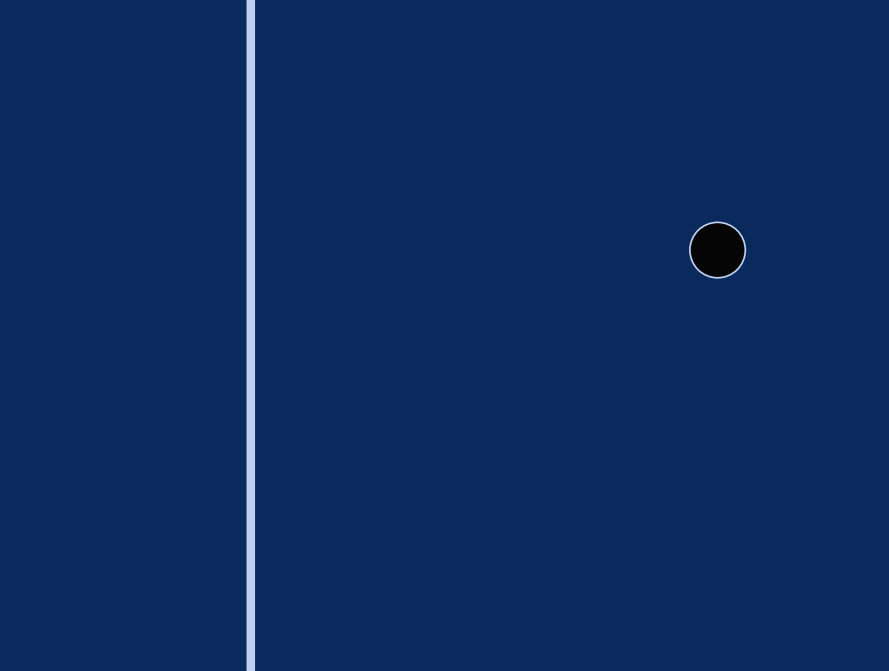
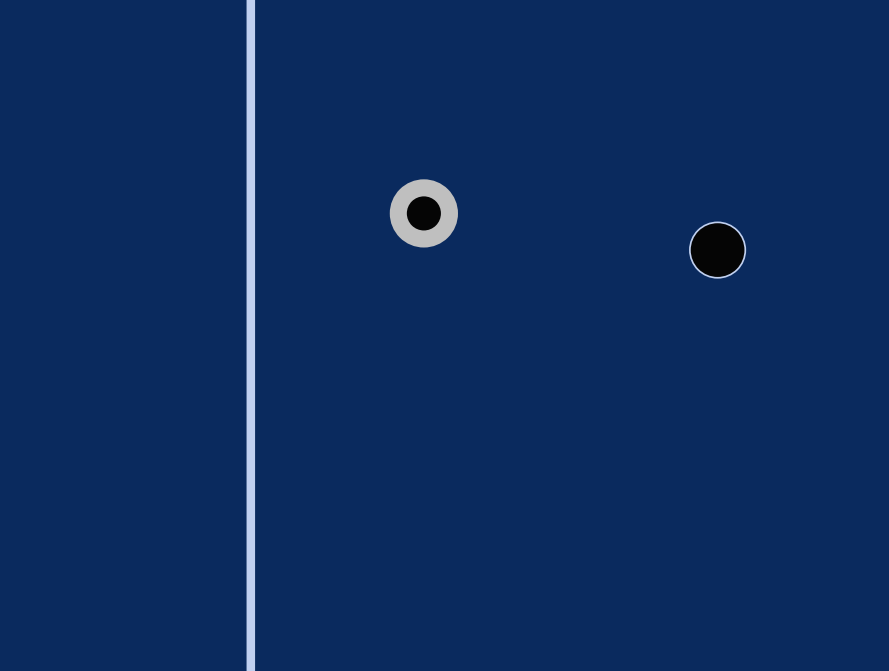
via: none -> (423, 213)

